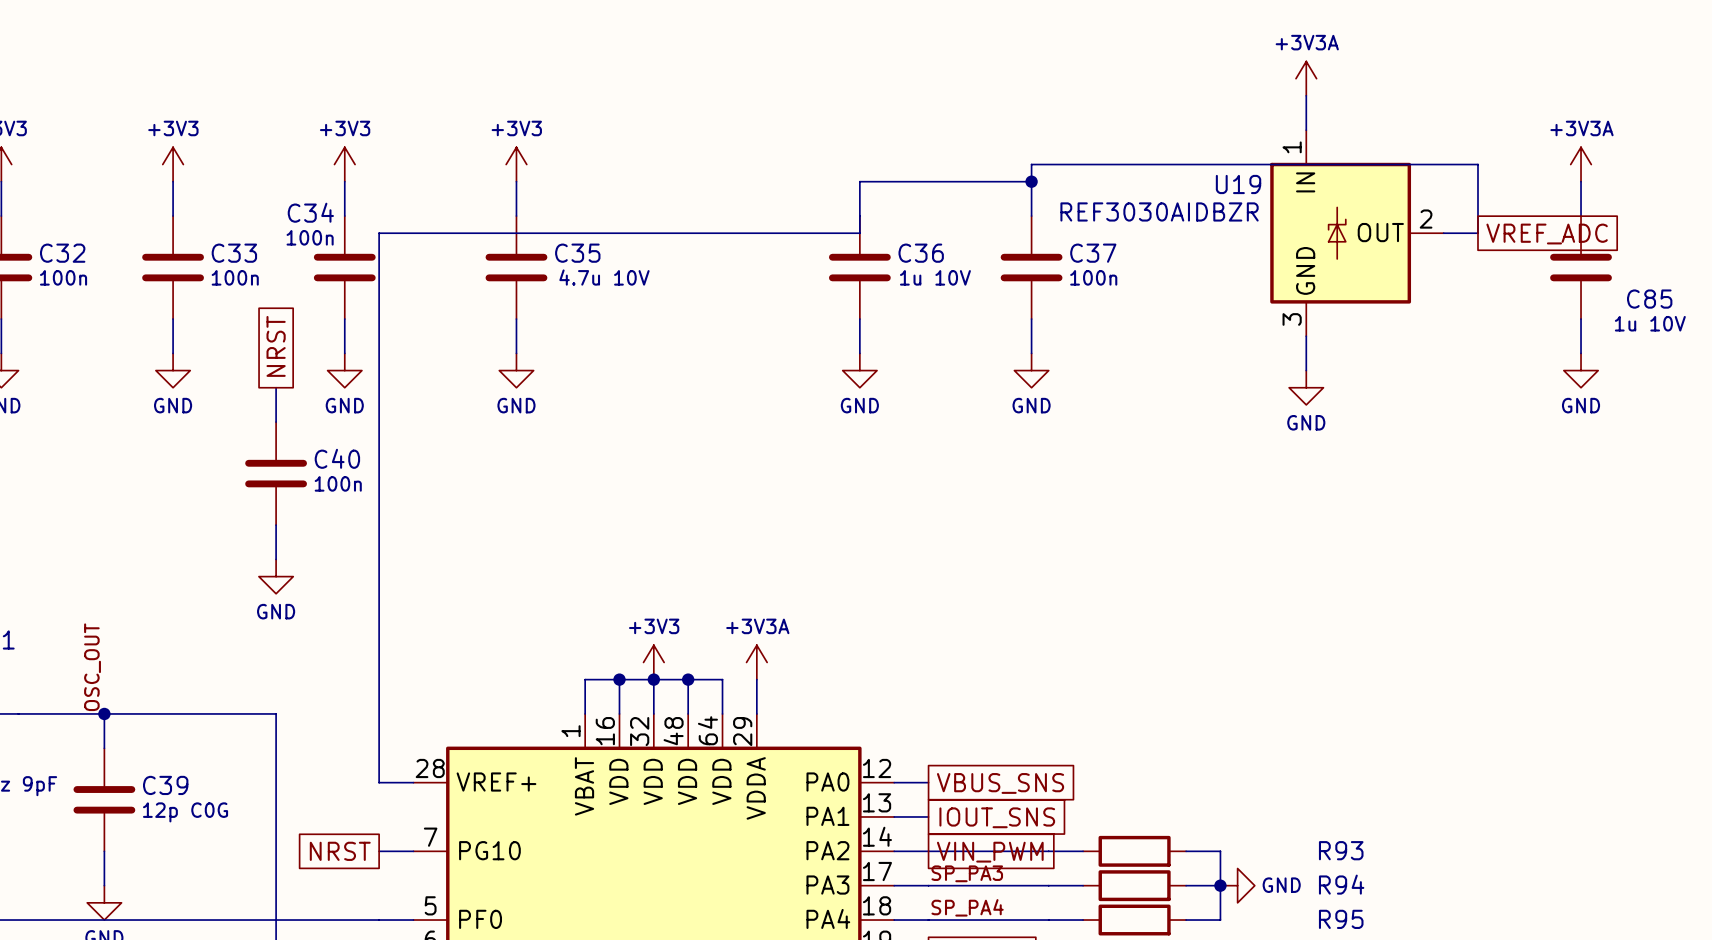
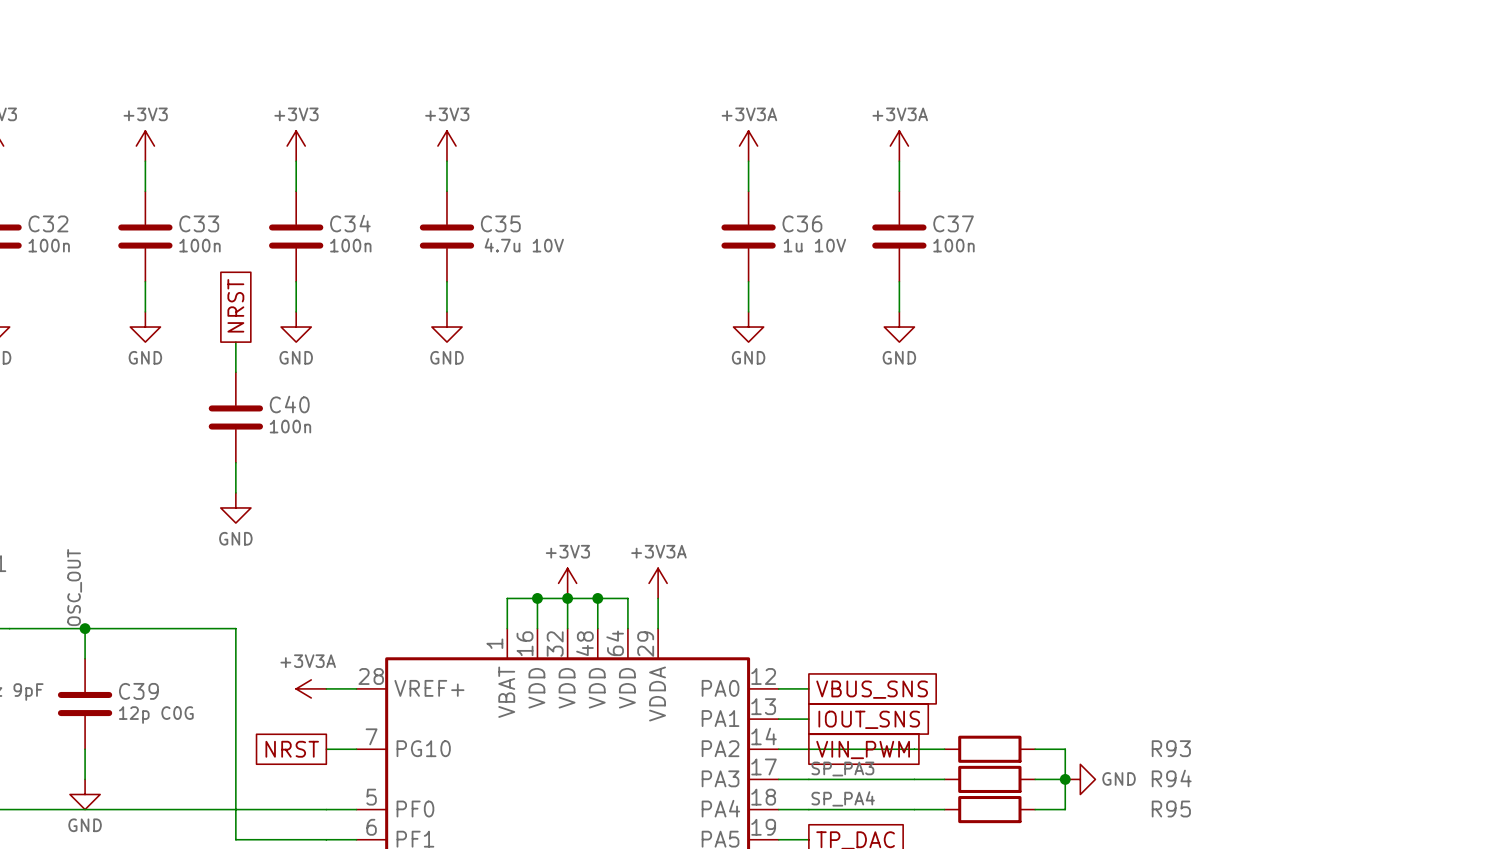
power symbol: +3V3A (1306, 78) -> none
wire: (1306, 95) (1306, 130) -> none
power symbol: none -> +3V3A (748, 146)
power symbol: none -> +3V3A (899, 146)
power symbol: +3V3A (1581, 164) -> none
wire: (859, 181) (1031, 181) (1031, 164) (1477, 164) (1477, 233) (1443, 233) -> none
junction: (1031, 181) -> none
wire: (1581, 181) (1581, 216) -> none
C34 name position: C34 (310, 212) -> C34 (350, 223)
wire: (859, 216) (859, 233) (379, 233) (379, 782) -> none
U19: REF3030AIDBZR (1356, 233) -> none
global label: VREF_ADC (1547, 234) -> none
C34 value position: 100n (310, 237) -> 100n (350, 245)
C85: 1u 10V (1581, 267) -> none
wire: (1581, 319) (1581, 353) -> none
wire: (1306, 336) (1306, 370) -> none
power symbol: GND (1581, 370) -> none
power symbol: GND (1306, 387) -> none
power symbol: none -> +3V3A (311, 688)

